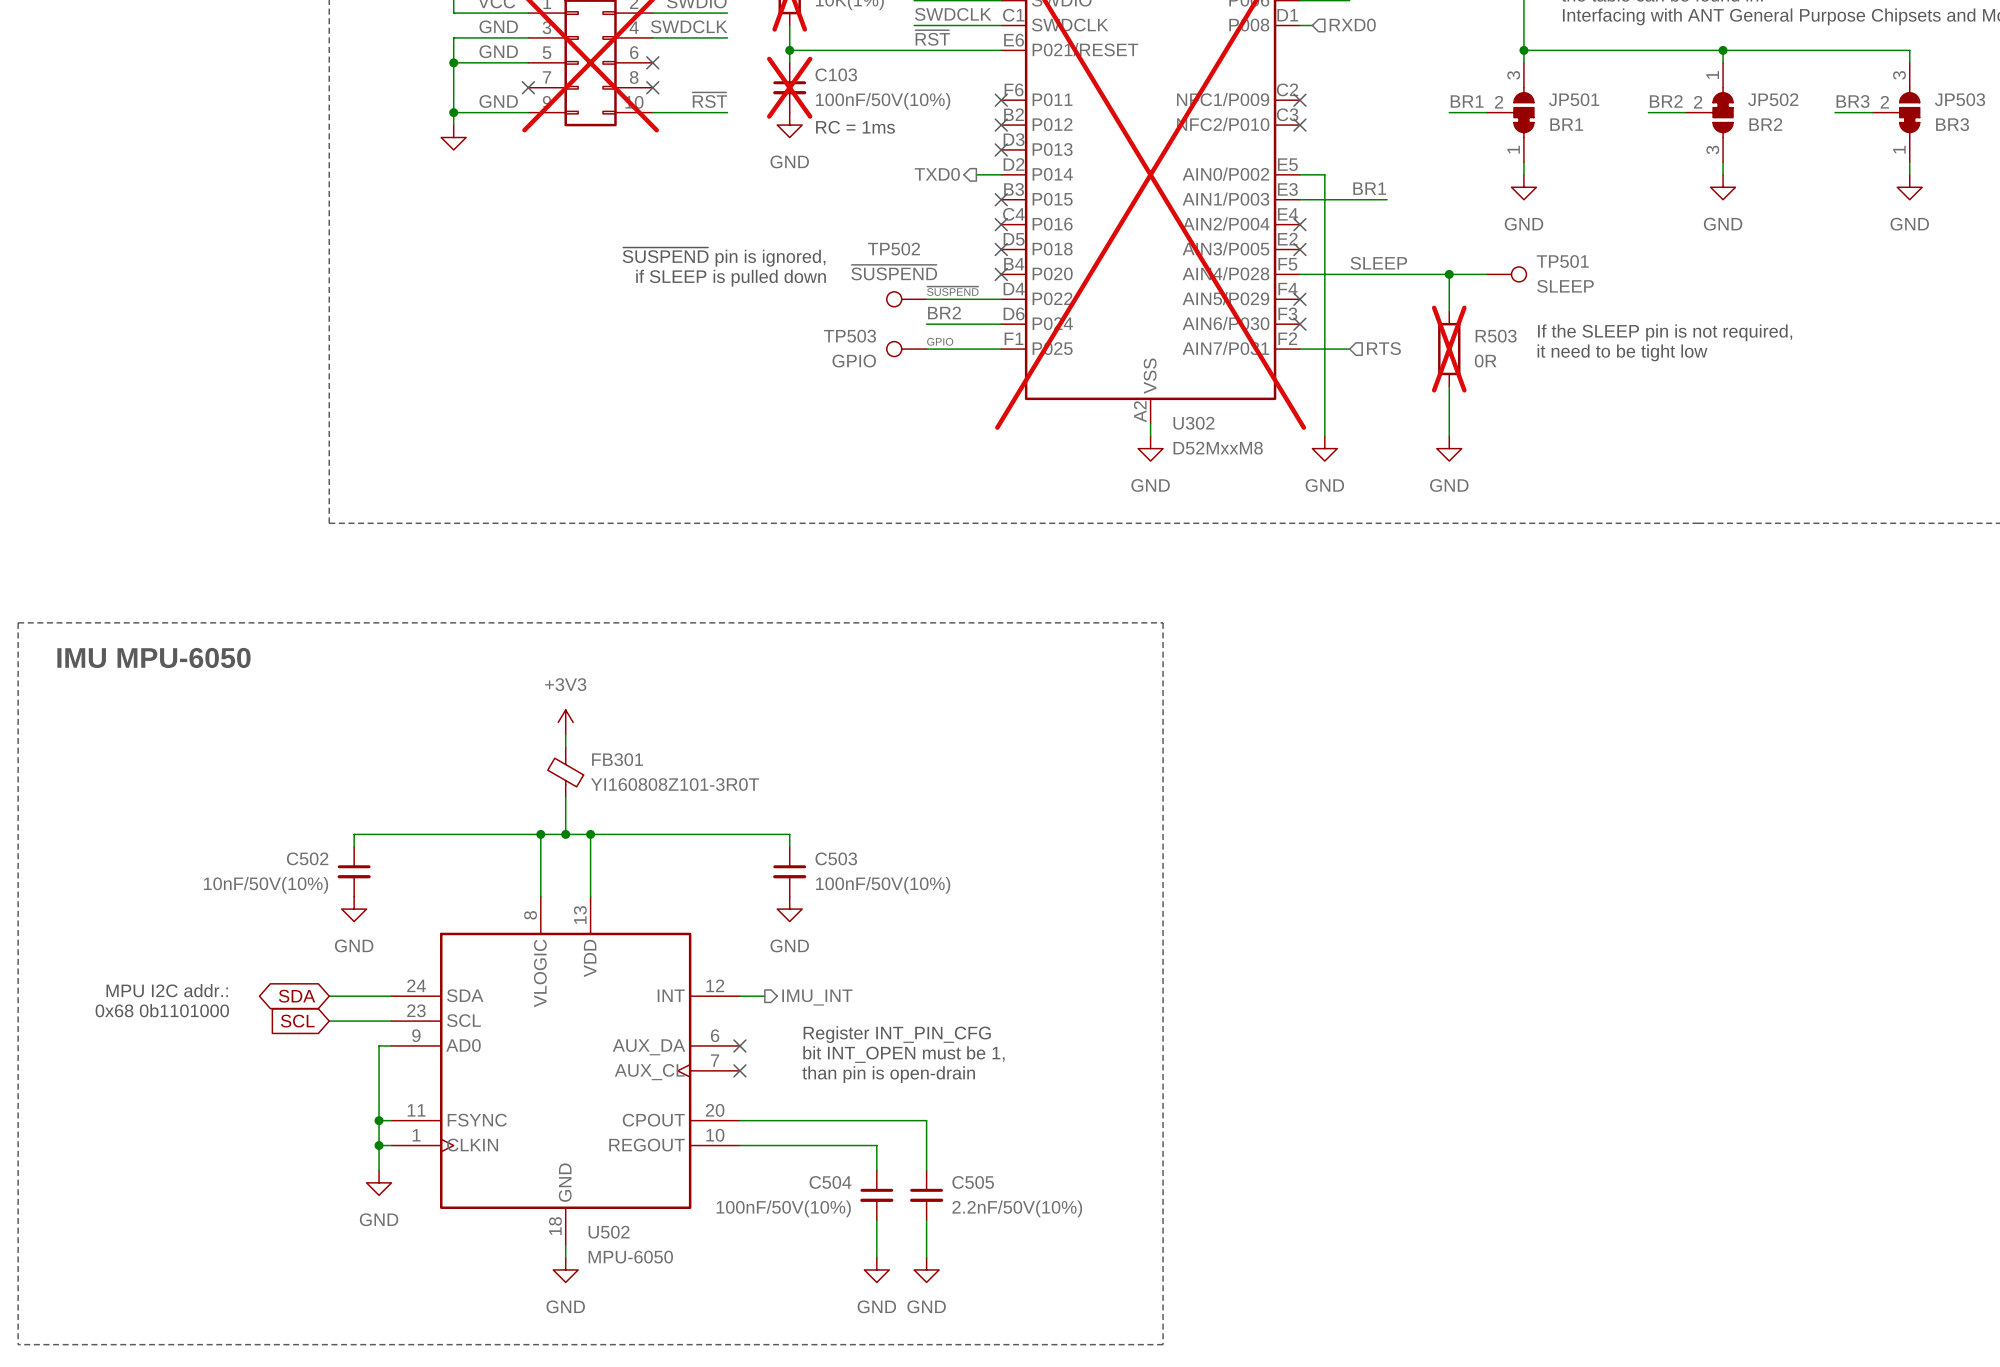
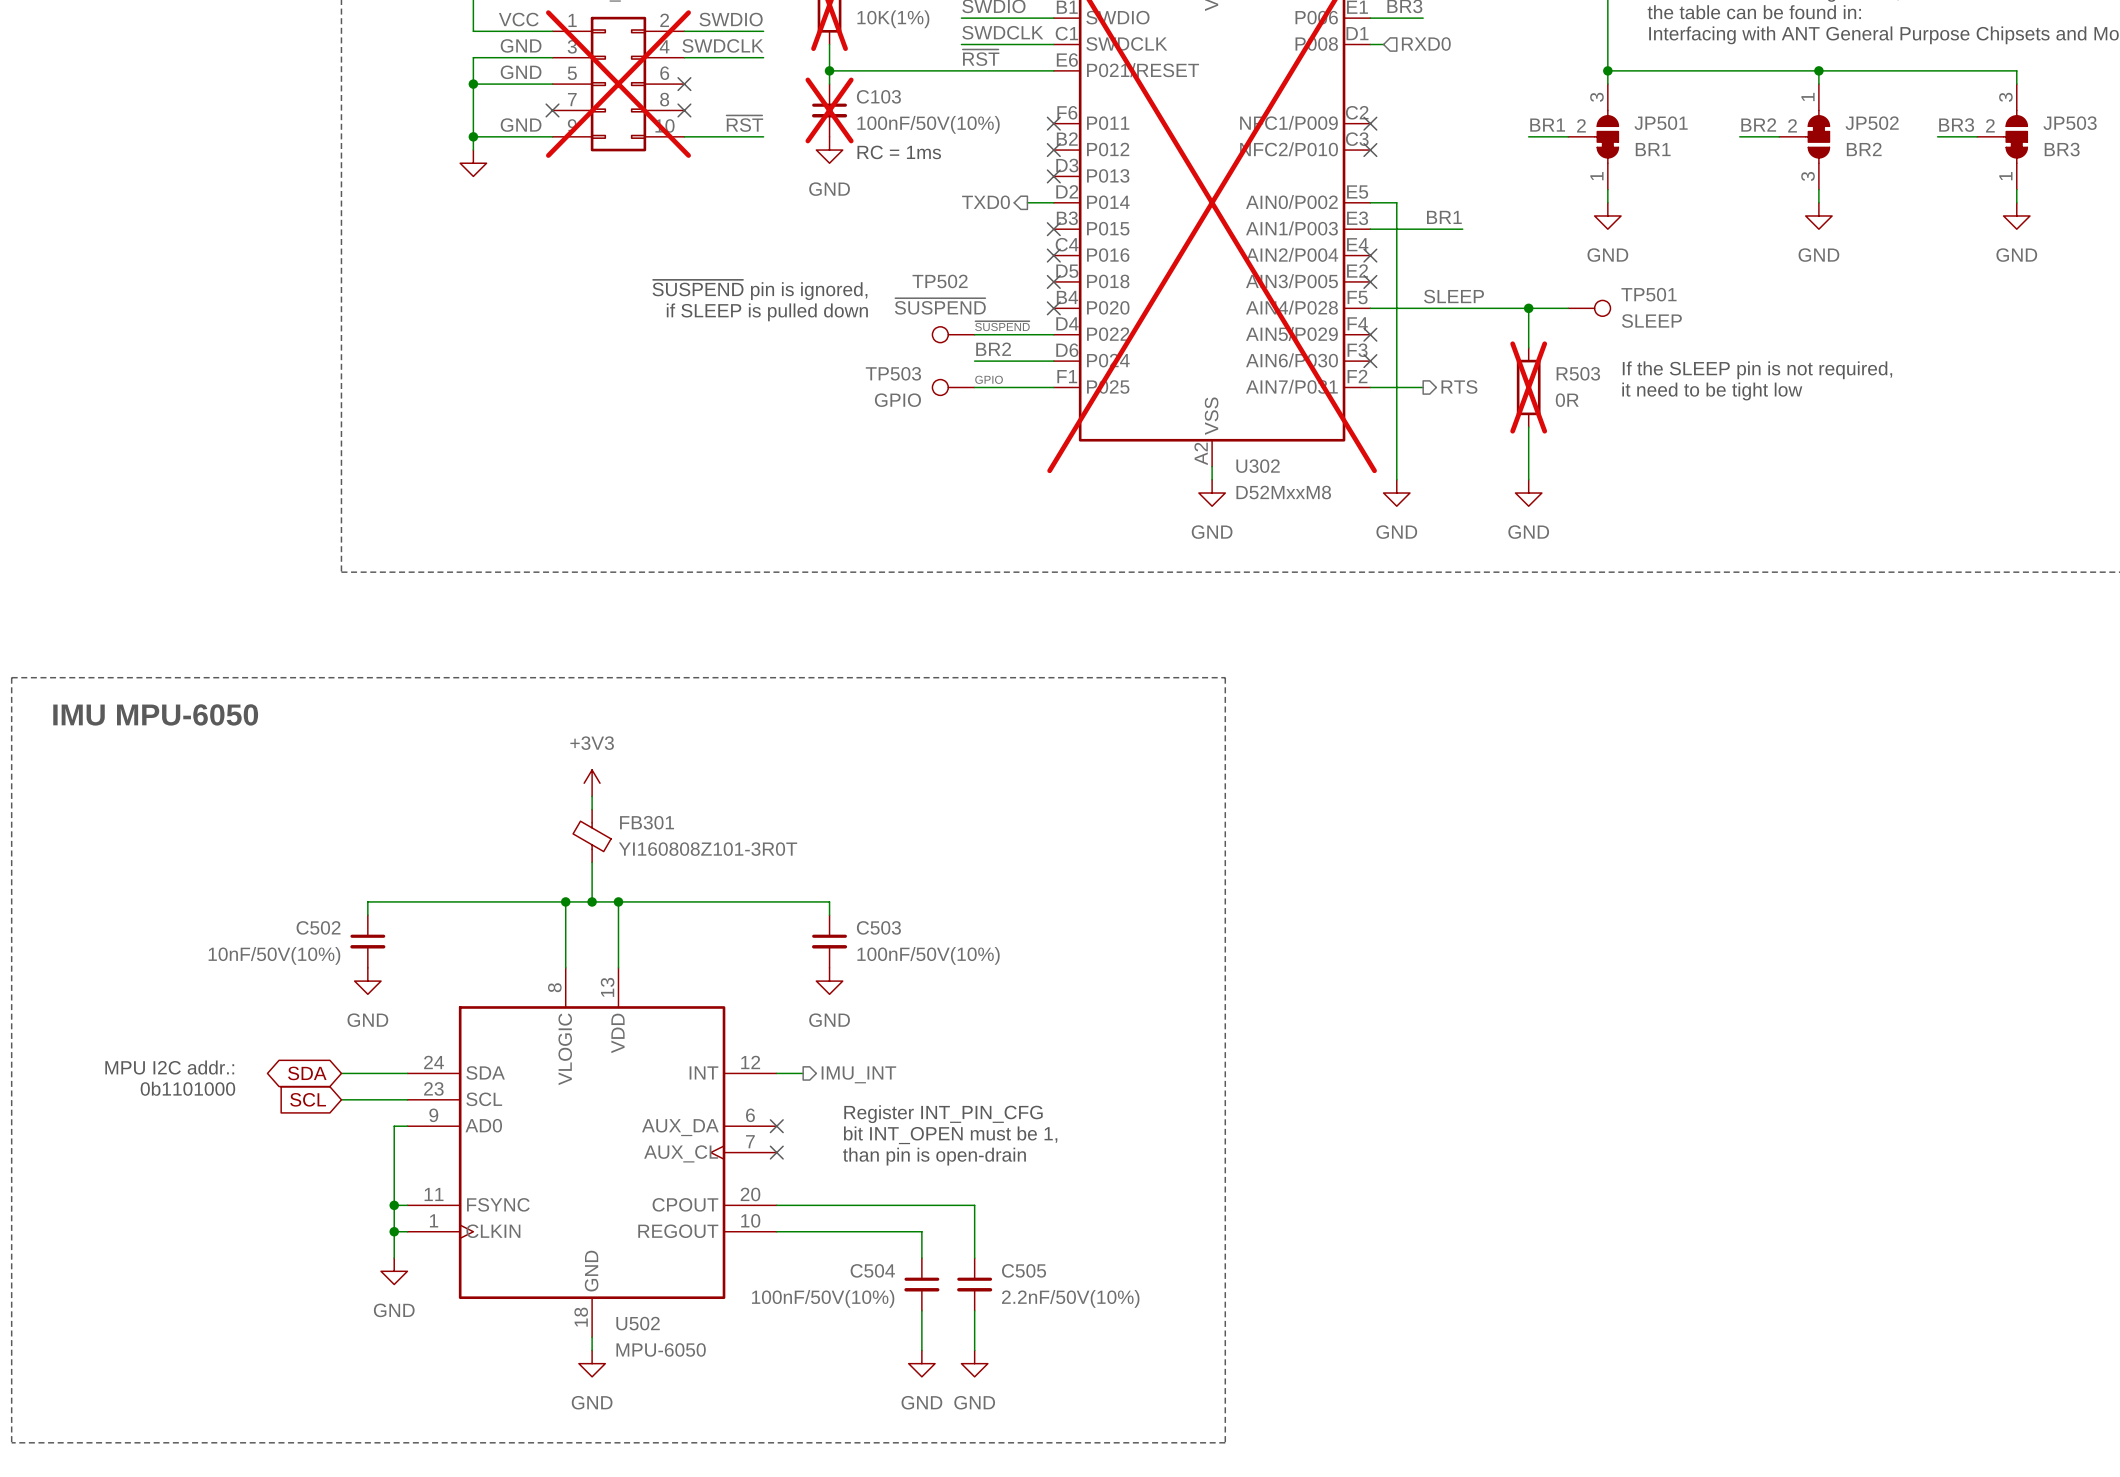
hierarchical label shape: input (1383, 348) -> output (1459, 386)
text: 0x68 0b1101000 (162, 1010) -> 0b1101000 (187, 1088)

